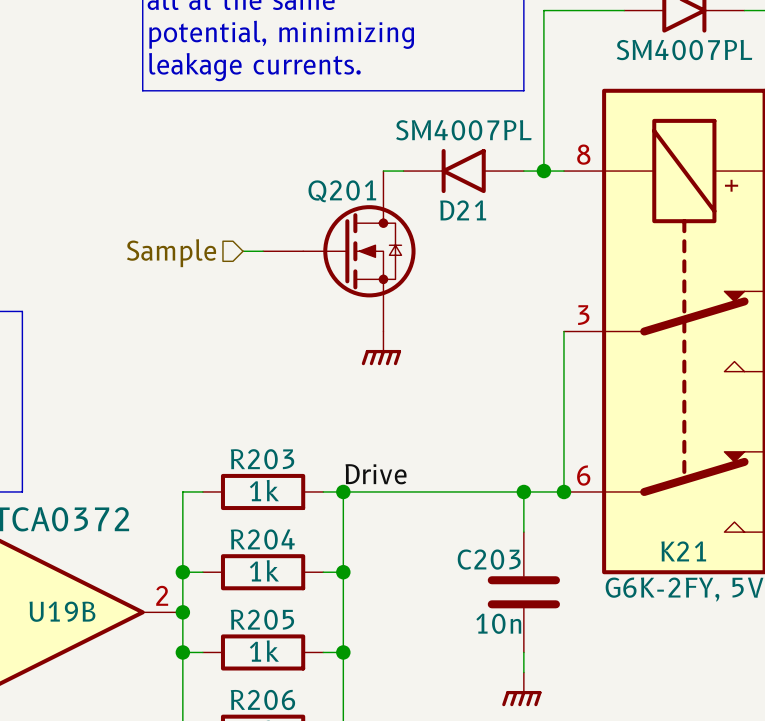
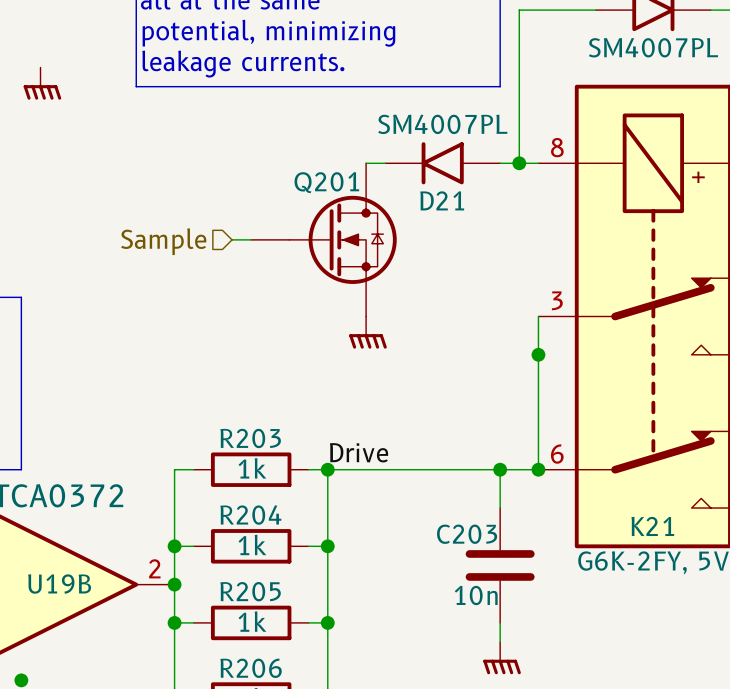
power symbol: none -> (42, 83)
power symbol flip: as is (381, 348) -> left-right (368, 332)
junction: none -> (538, 354)
power symbol flip: as is (521, 689) -> left-right (502, 658)
junction: none -> (21, 680)

